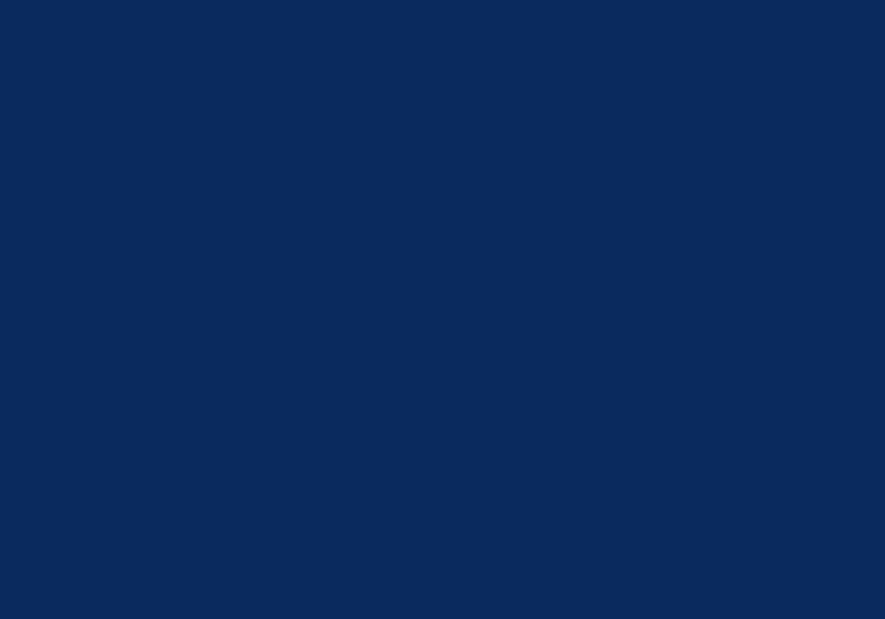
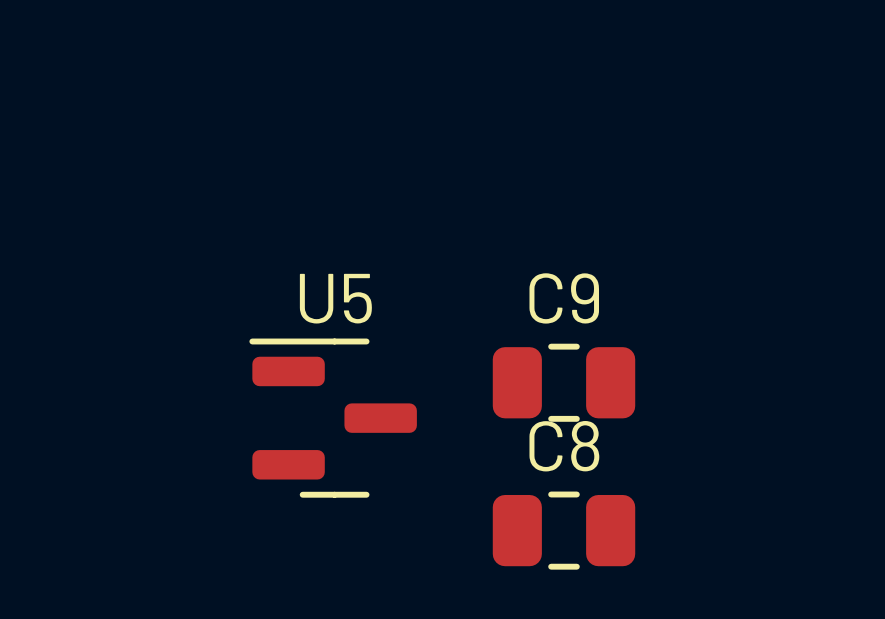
C9: none -> (564, 382)
U5: none -> (333, 418)
C8: none -> (564, 530)

